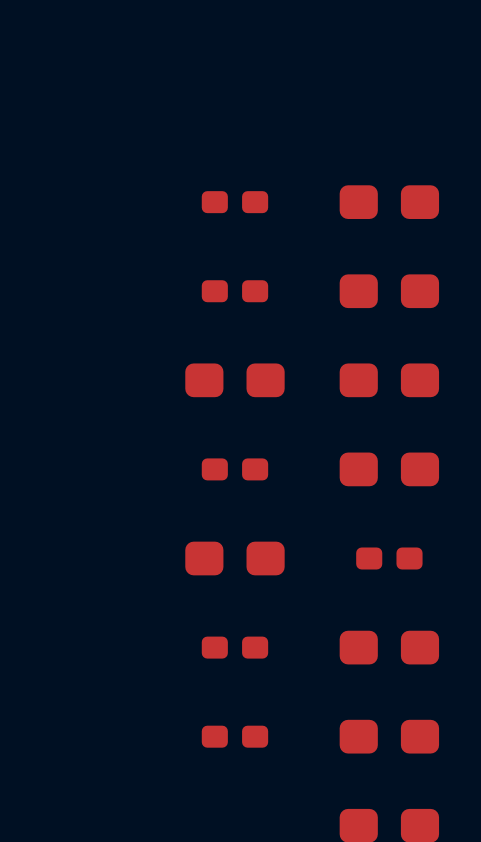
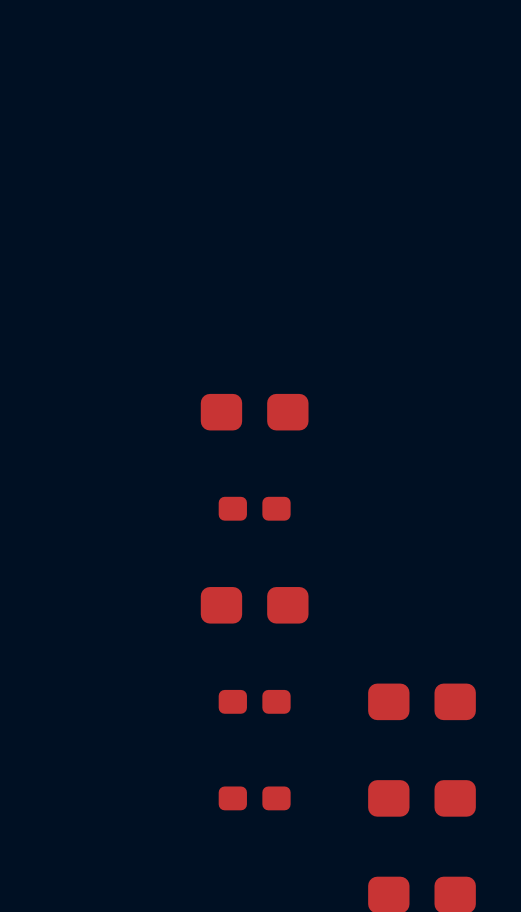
part: (234, 202) -> none
part: (389, 202) -> none
part: (234, 291) -> none
part: (389, 291) -> none
part: (389, 380) -> none
part: (389, 469) -> none
part: (389, 558) -> none

